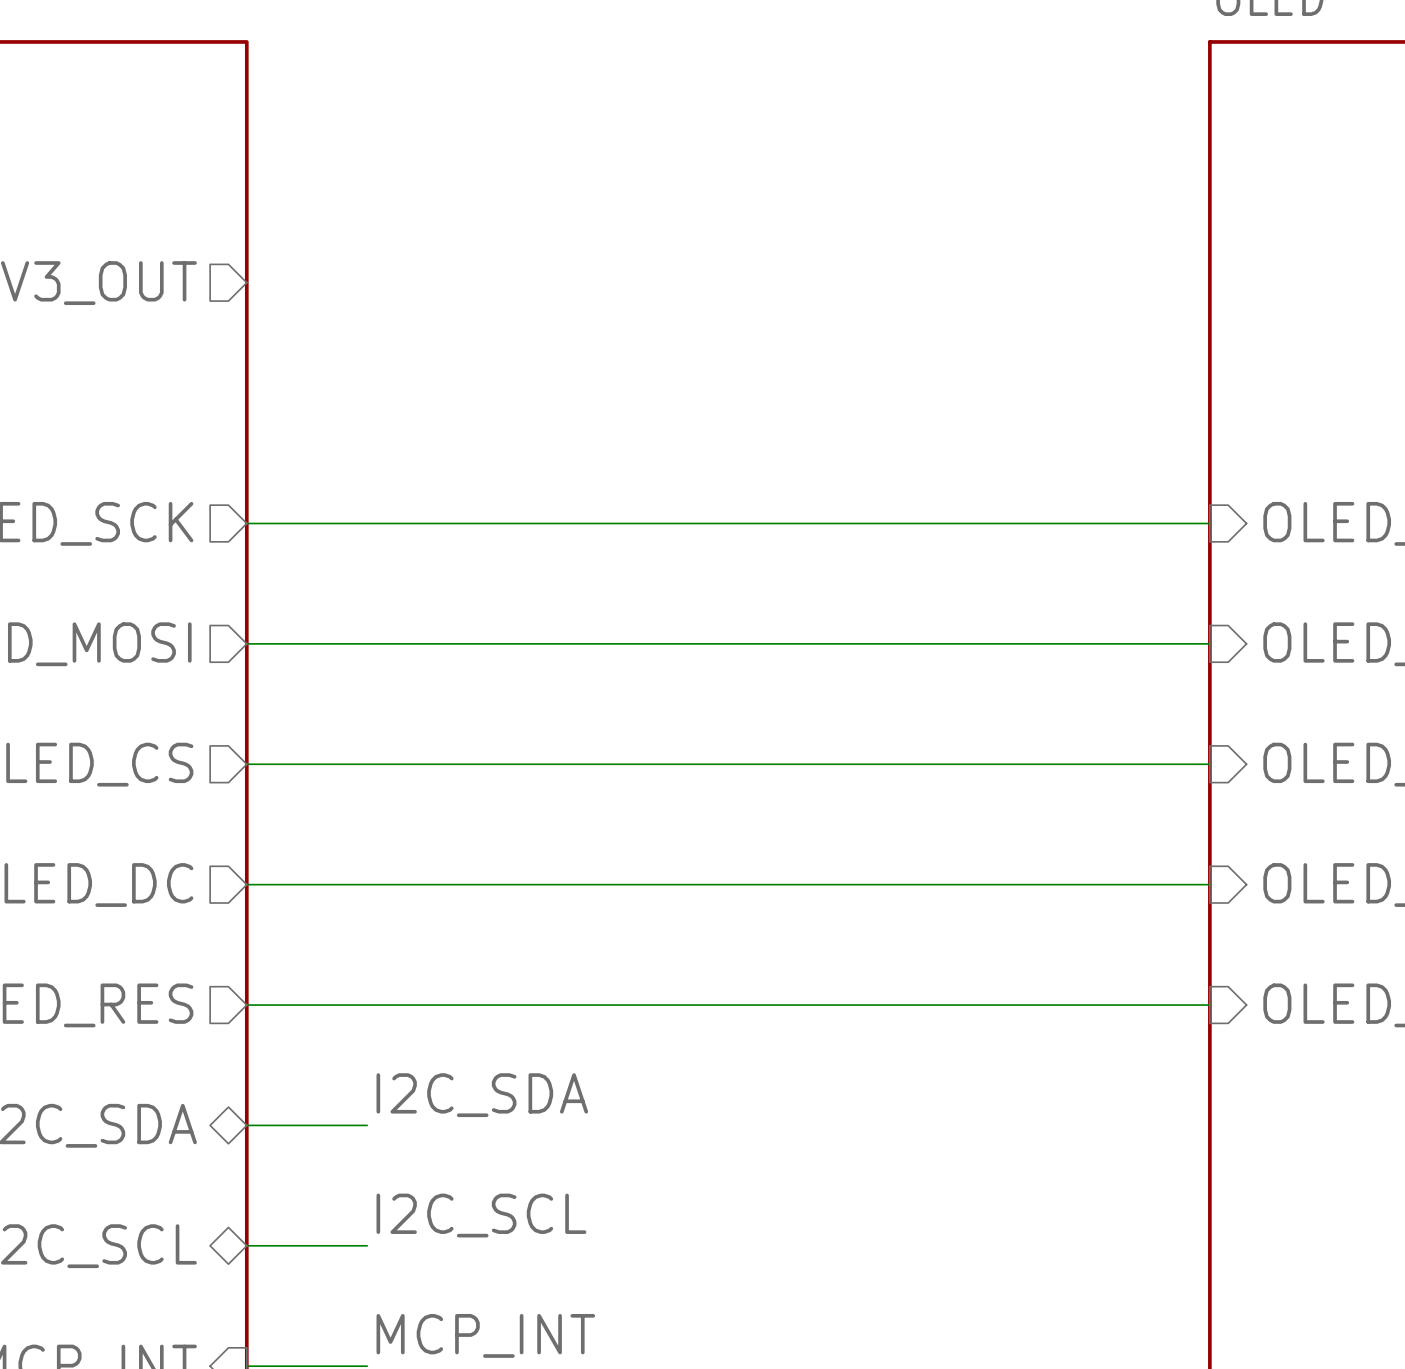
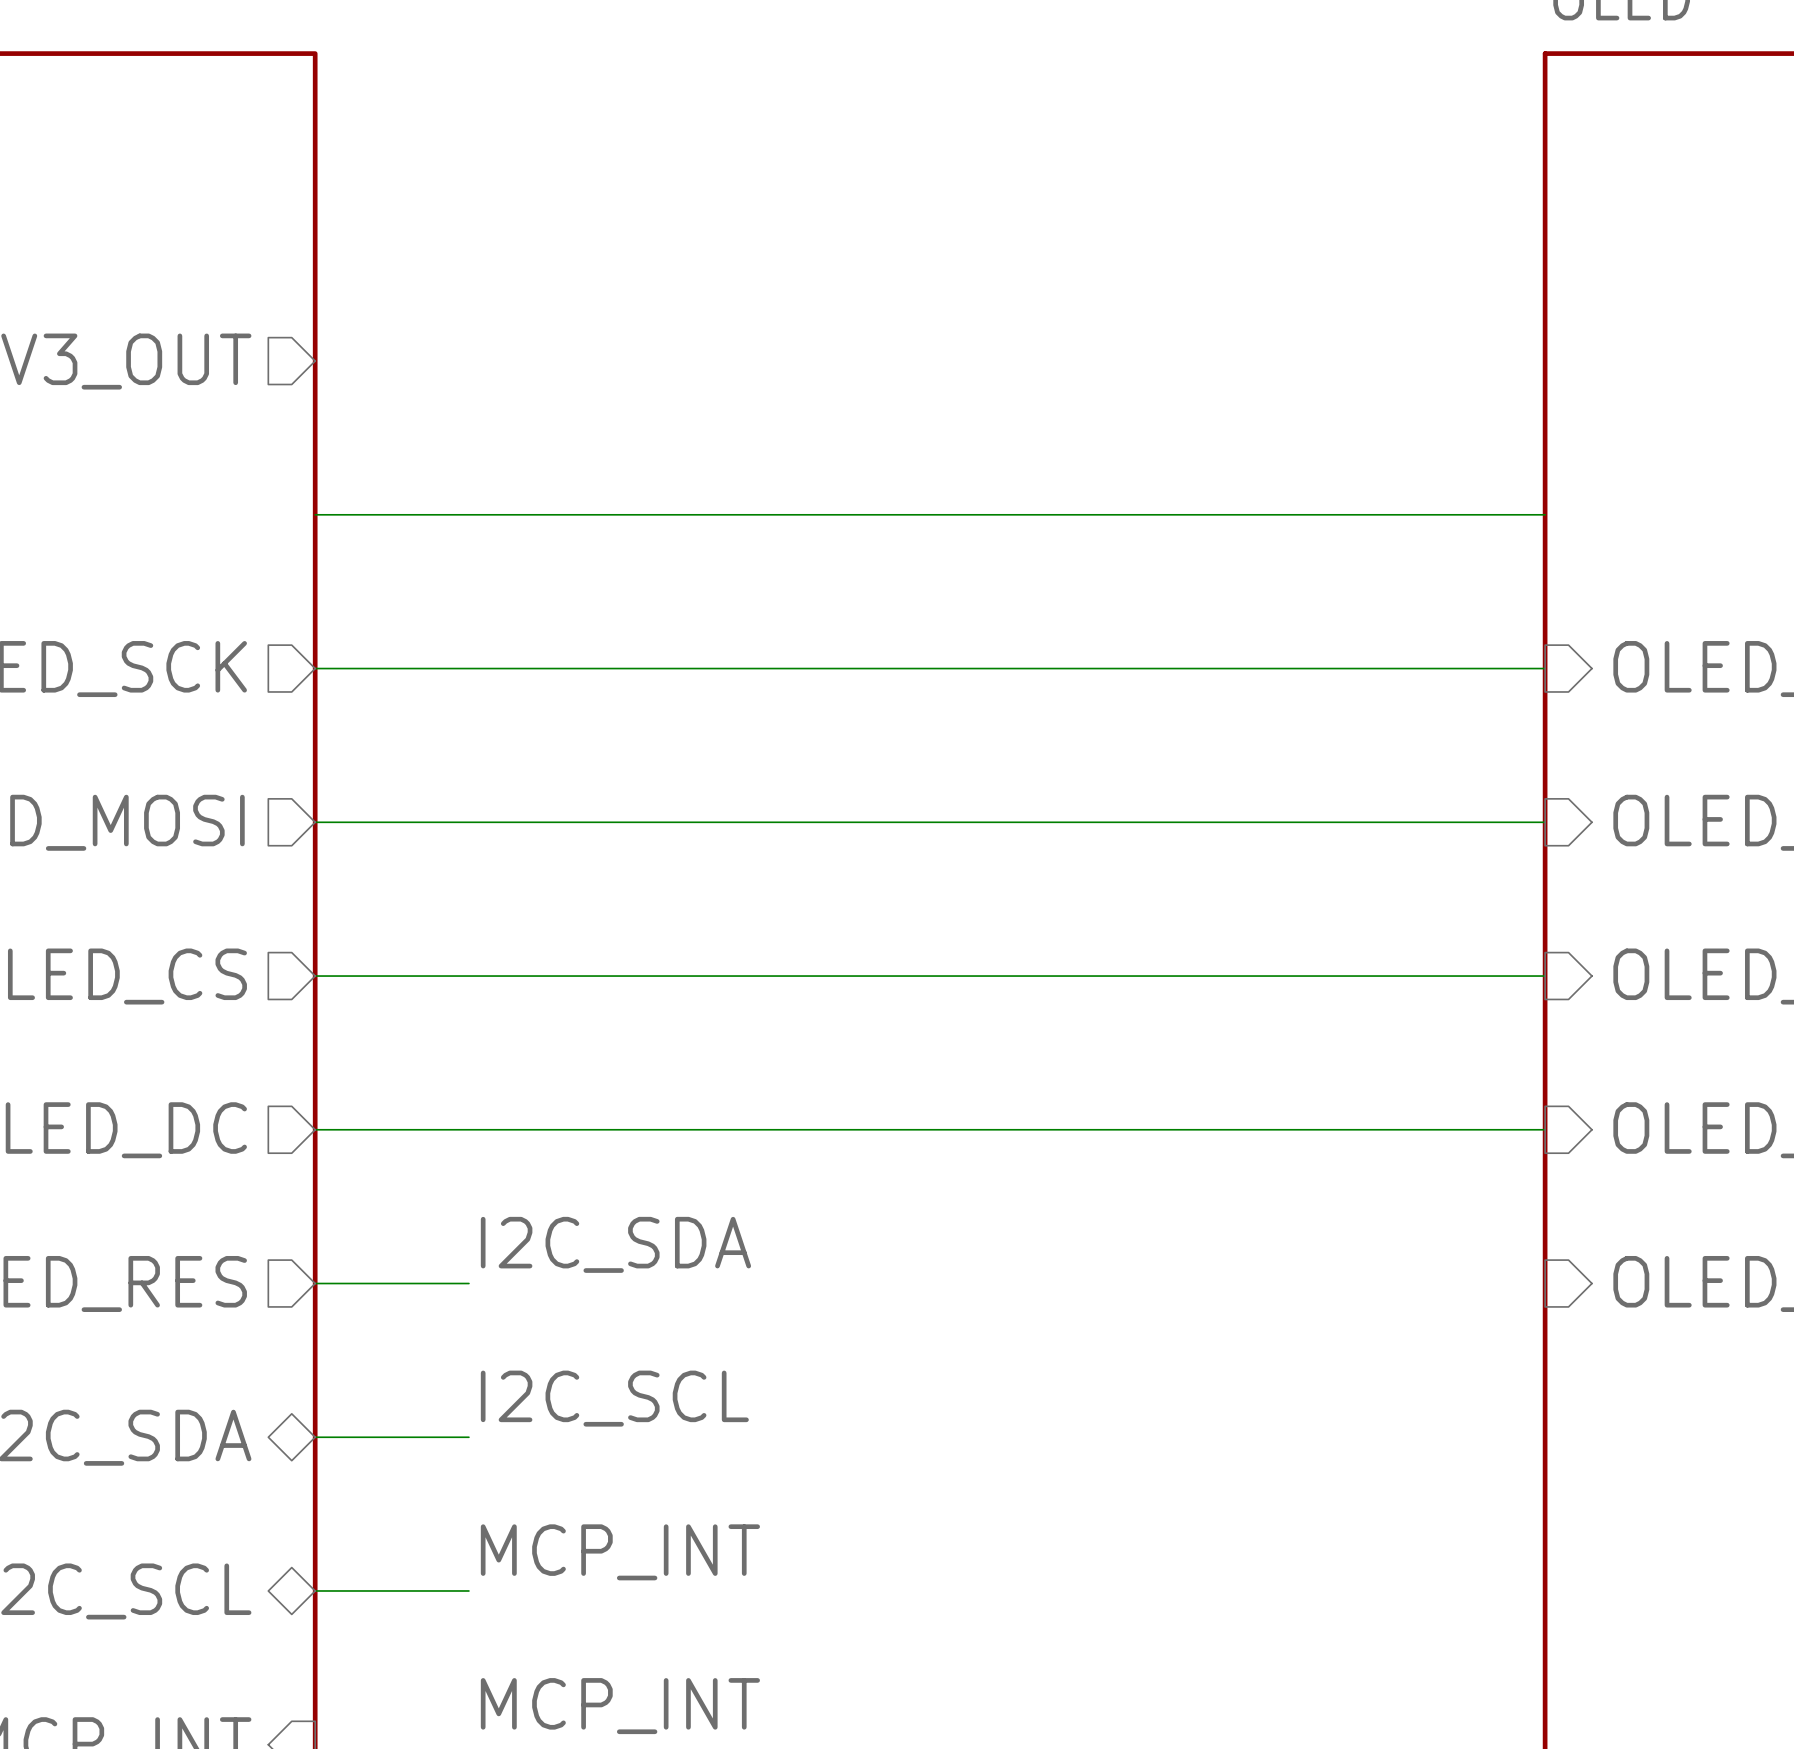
wire: none -> (315, 514) (1545, 514)
label: none -> I2C_SDA (615, 1244)
wire: (367, 1005) (1209, 1005) -> none
label: I2C_SDA (482, 1095) -> I2C_SCL (614, 1398)
label: I2C_SCL (481, 1215) -> MCP_INT (620, 1552)
wire: (246, 1366) (367, 1366) -> none

